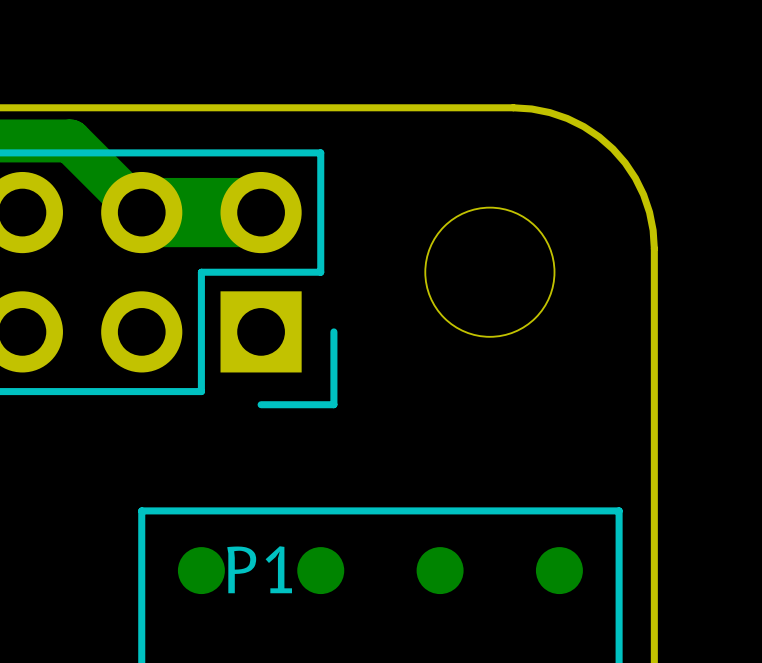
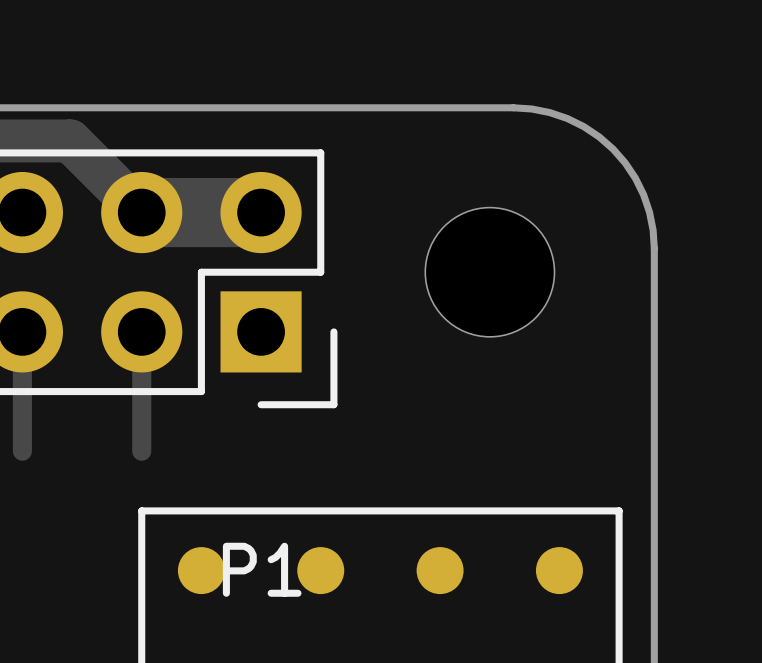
track: none -> (22, 331) (22, 451)
track: none -> (141, 331) (141, 451)

